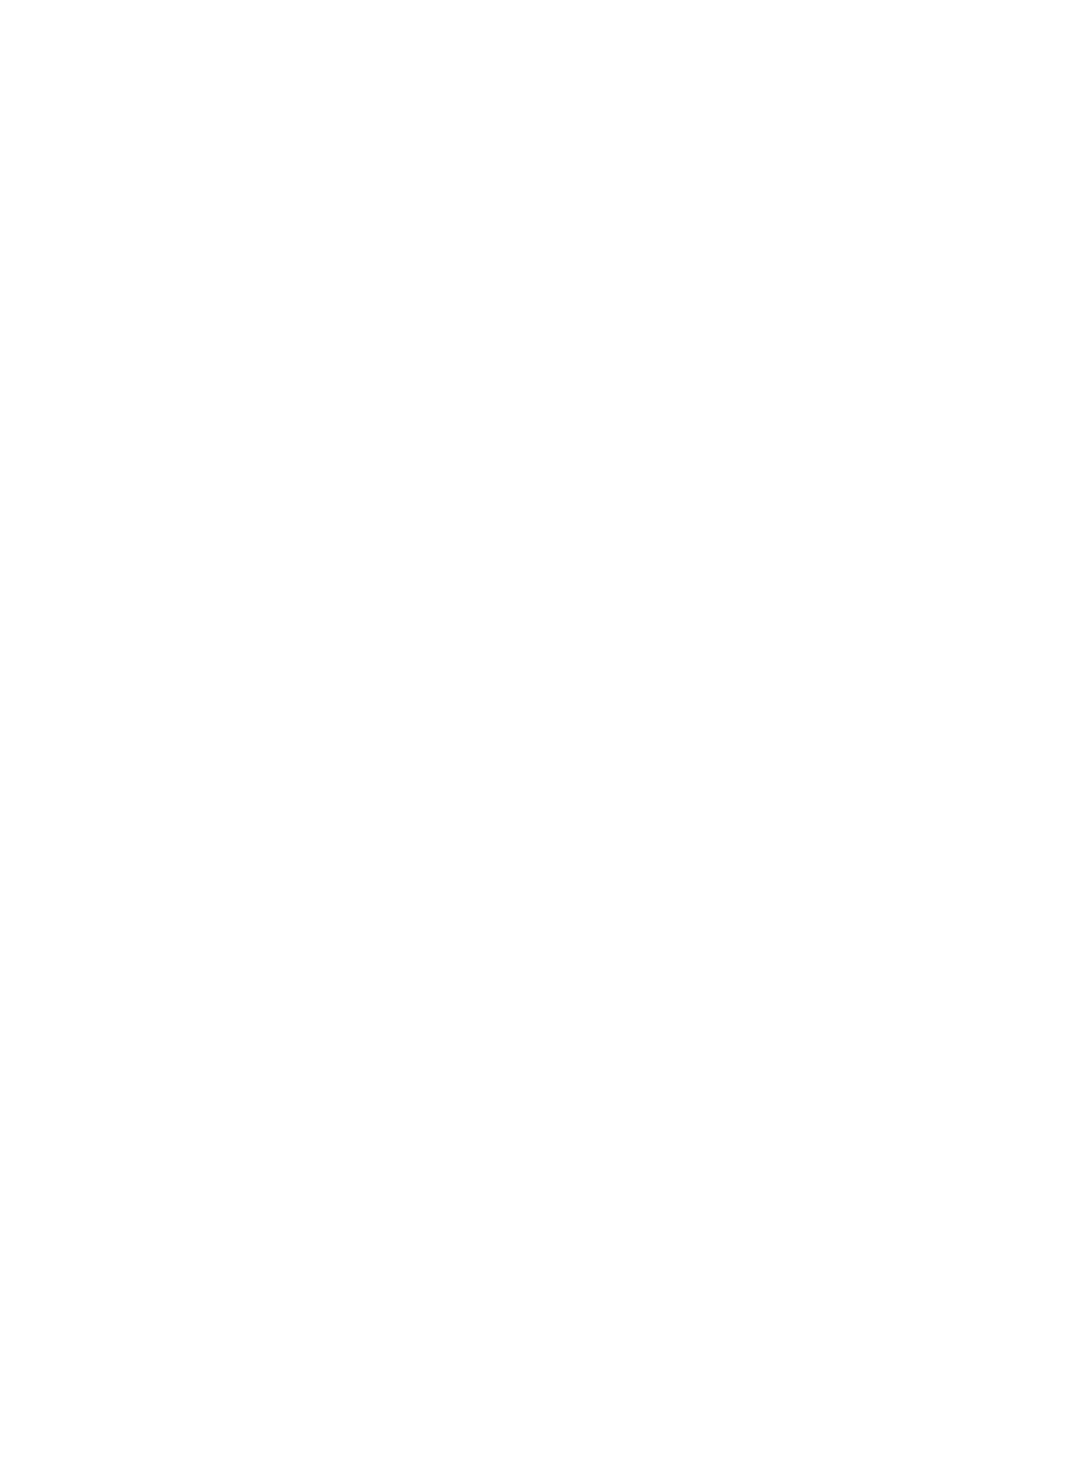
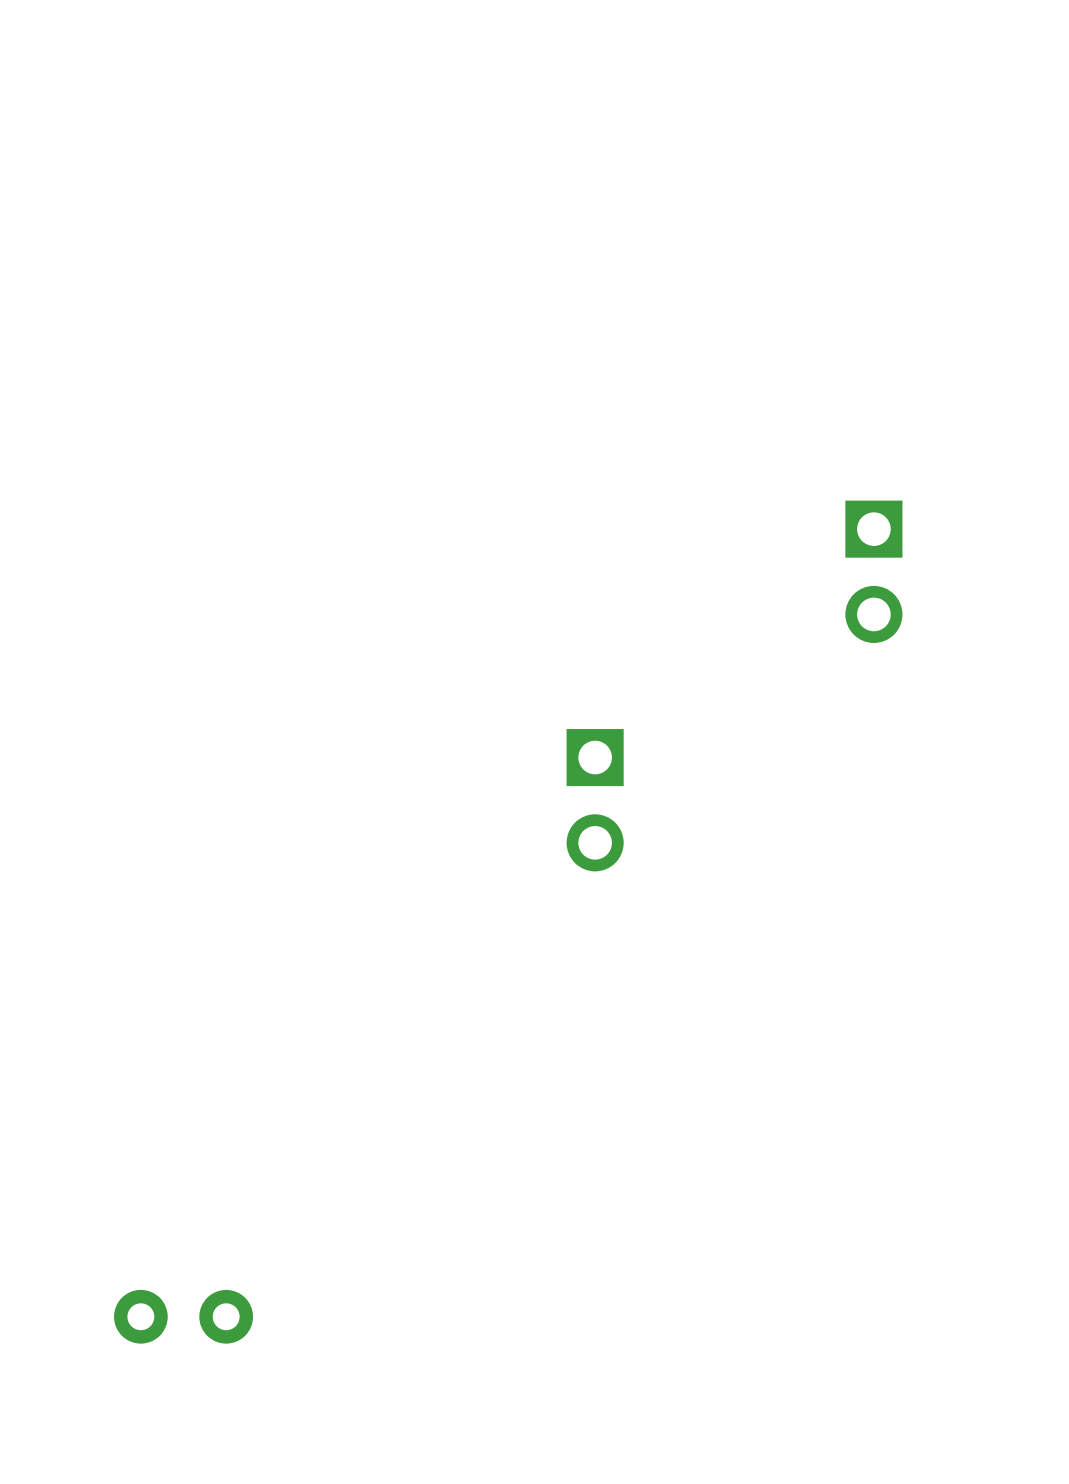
part: none -> (873, 571)
part: none -> (595, 800)
part: none -> (183, 1316)

